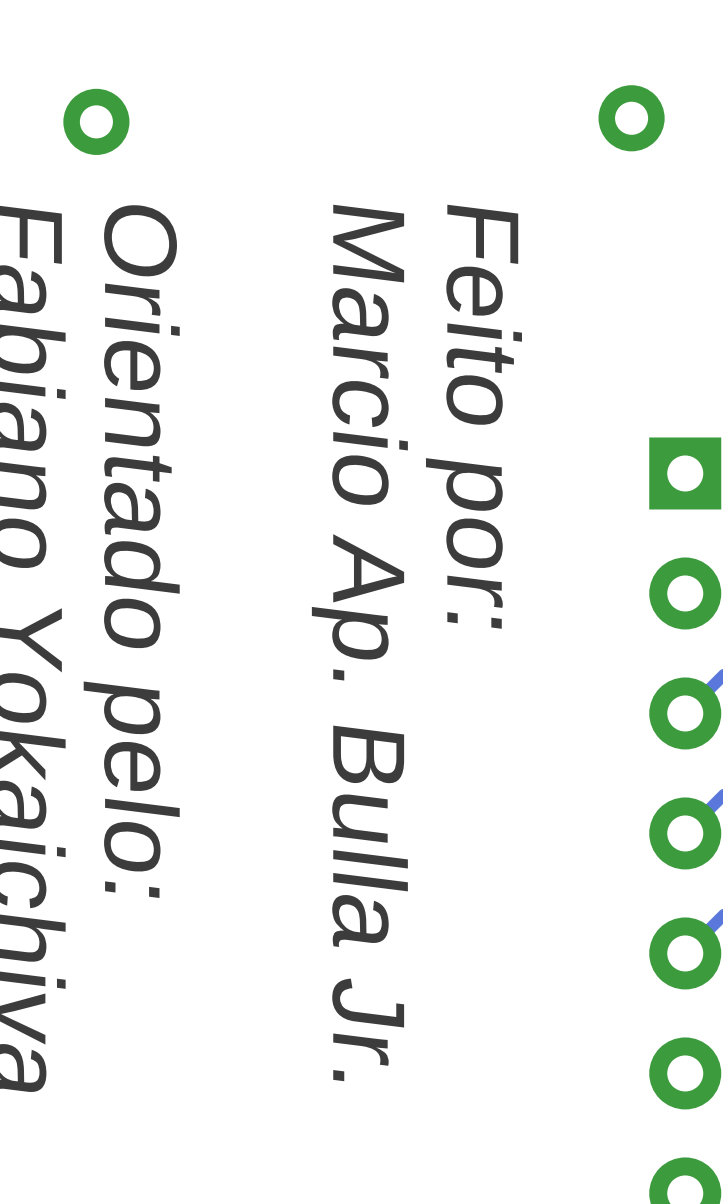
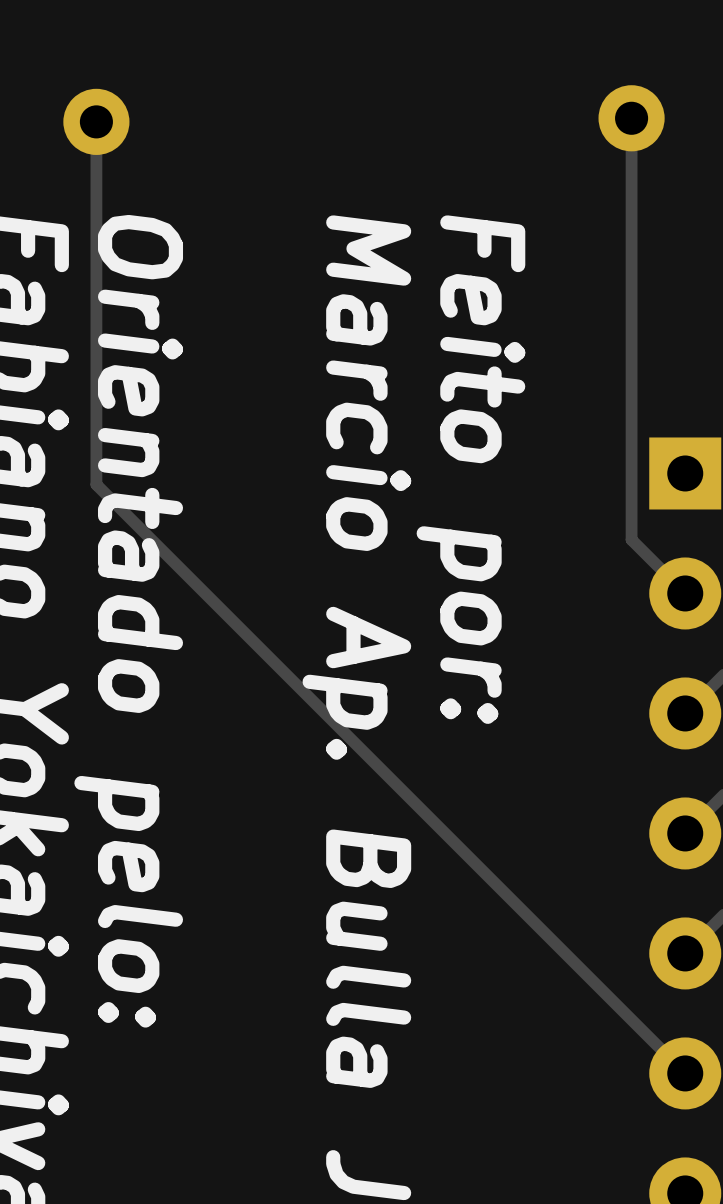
track: none -> (631, 118) (631, 539) (685, 593)
track: none -> (96, 121) (96, 484) (685, 1073)

